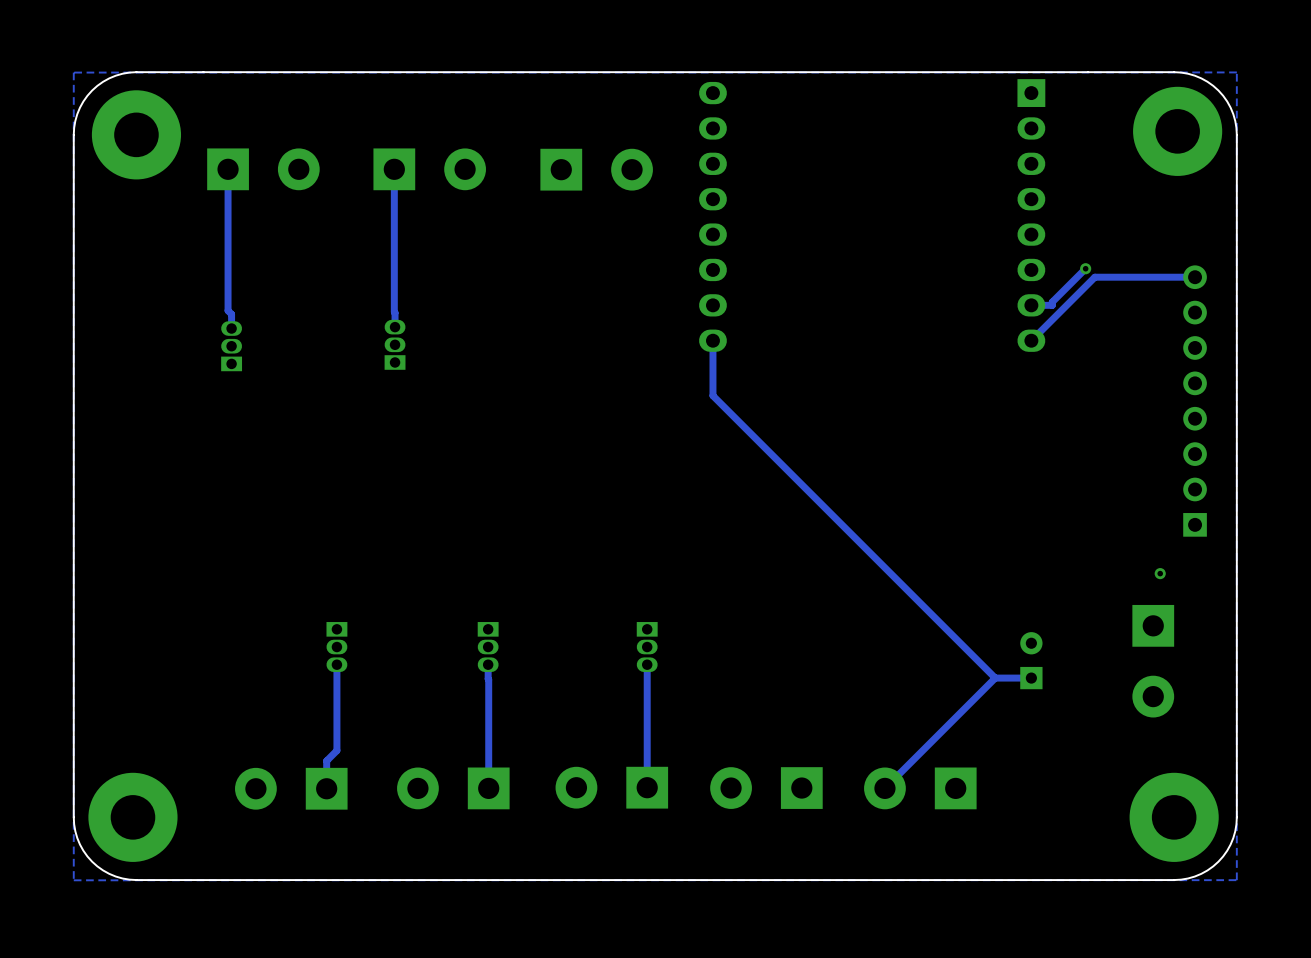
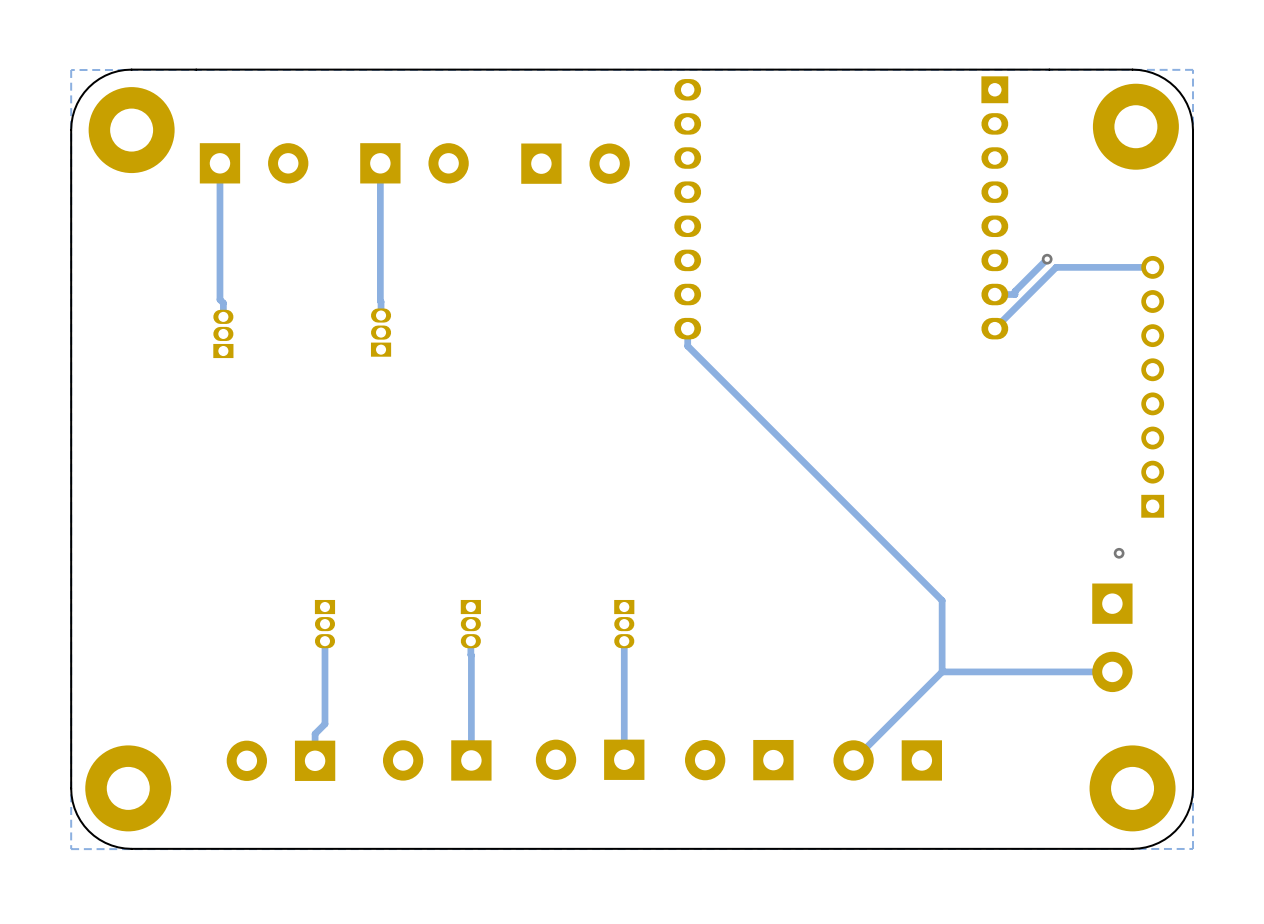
track: (712, 358) (712, 395) (995, 678) -> (687, 346) (942, 600) (942, 671) (1112, 671)
part: (1031, 660) -> none
track: (995, 678) (976, 696) -> none
track: (1031, 678) (995, 678) -> none

